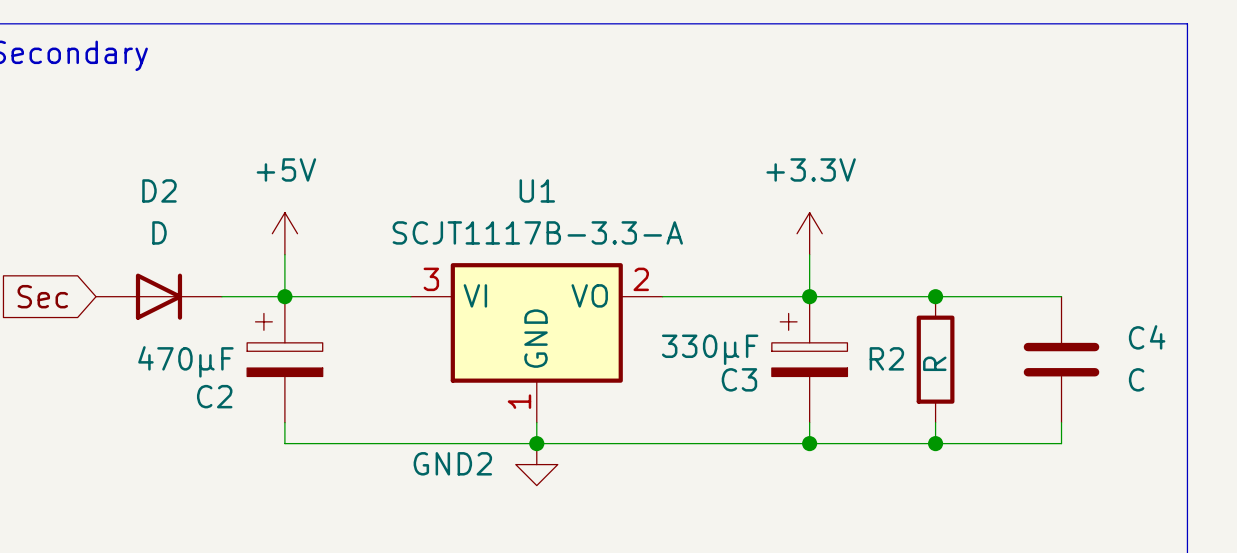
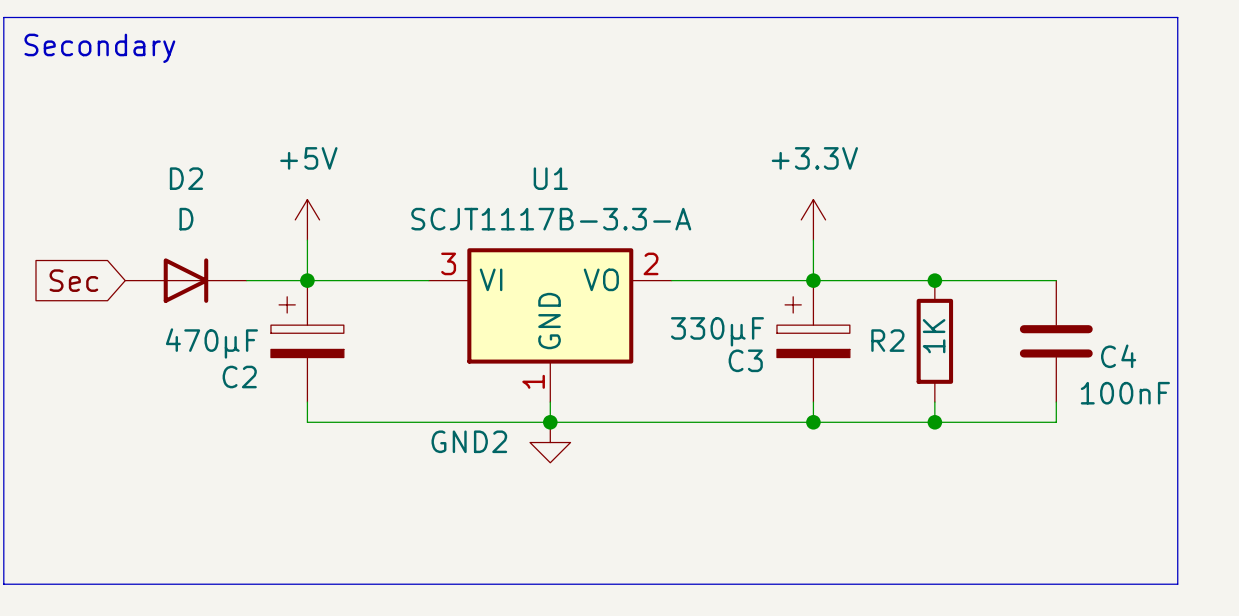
C4 name position: C4 (1147, 337) -> C4 (1118, 356)
R2 value: R (934, 363) -> 1K (934, 336)
C4 value: C (1136, 379) -> 100nF (1125, 393)

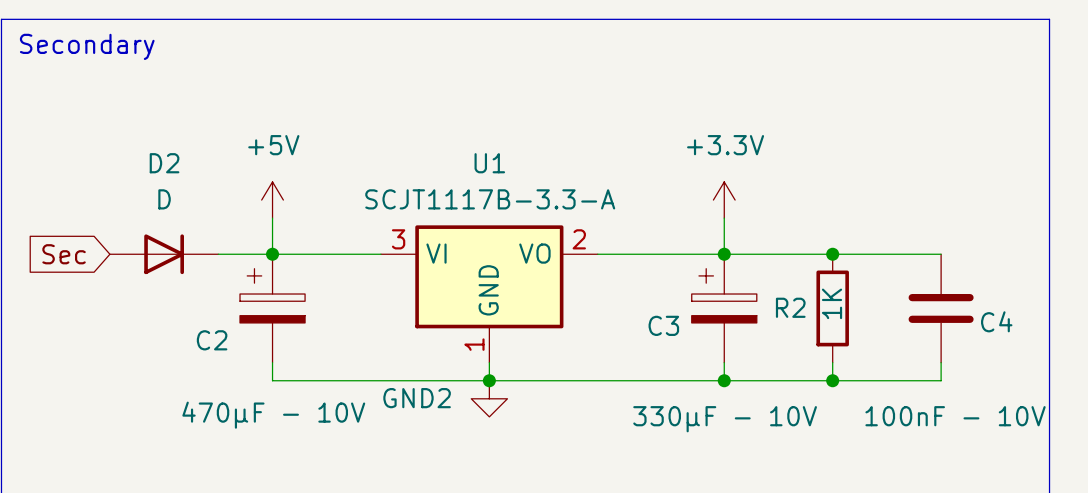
C3 value: 330µF (717, 331) -> 330µF - 10V (725, 419)
C2 value: 470µF (211, 343) -> 470µF - 10V (273, 415)
C4 value: 100nF (1125, 393) -> 100nF - 10V (955, 416)

